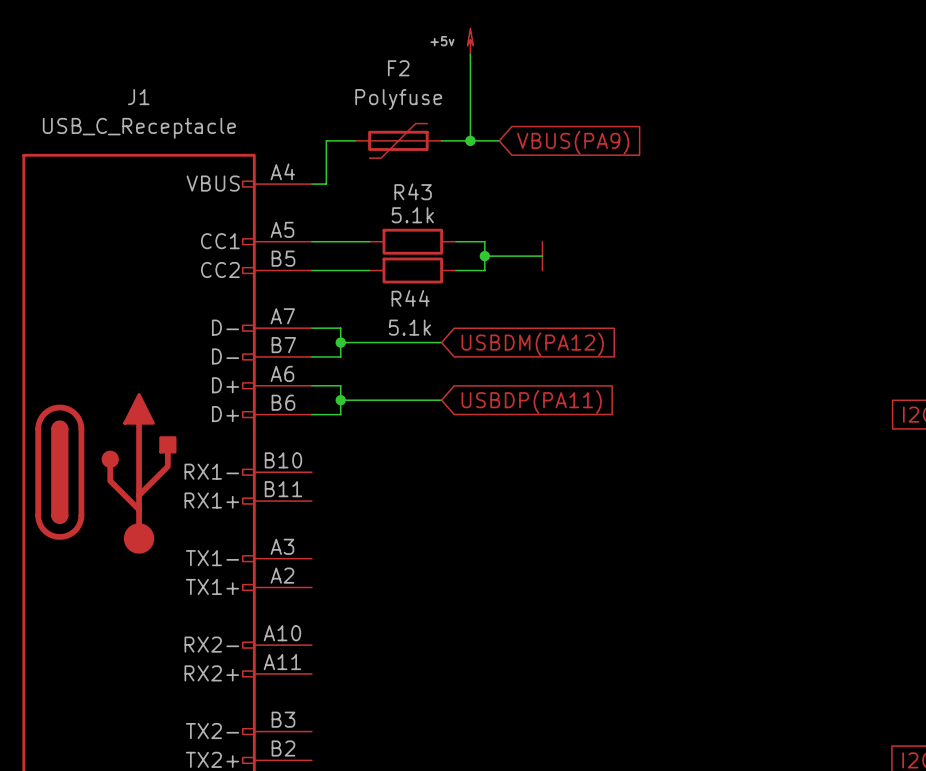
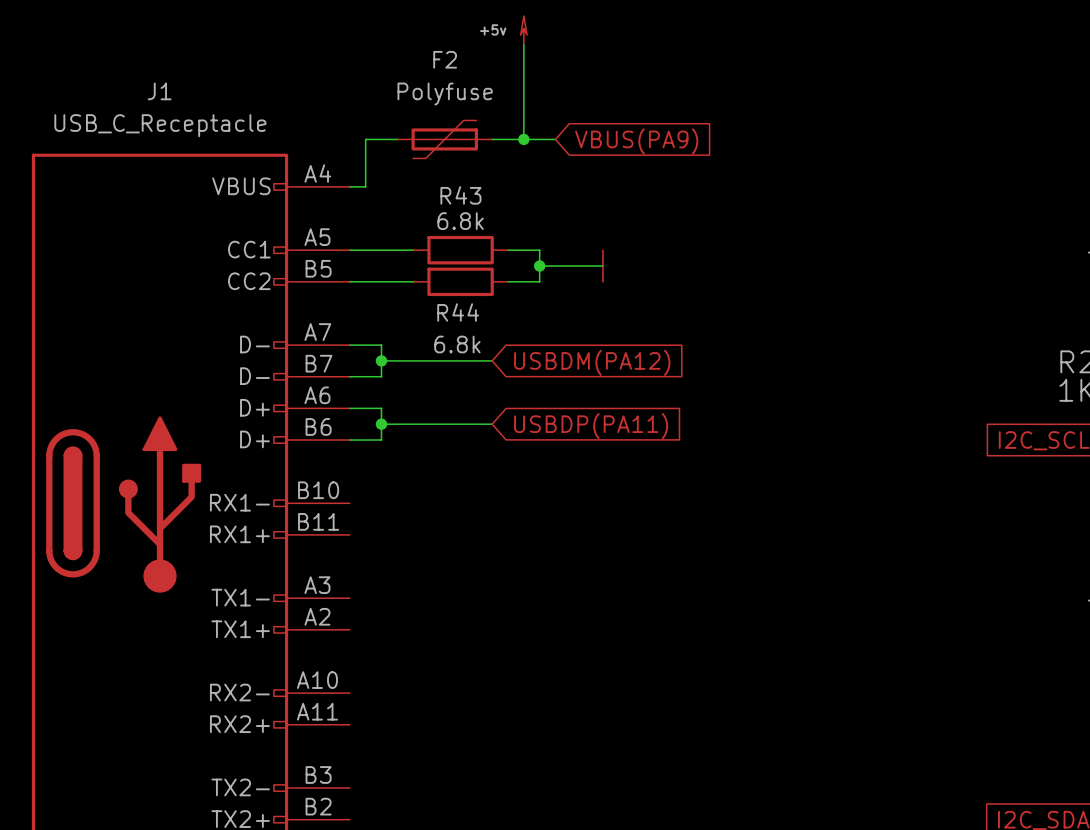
R43 value: 5.1k (412, 215) -> 6.8k (460, 221)
R44 value: 5.1k (409, 327) -> 6.8k (457, 344)

